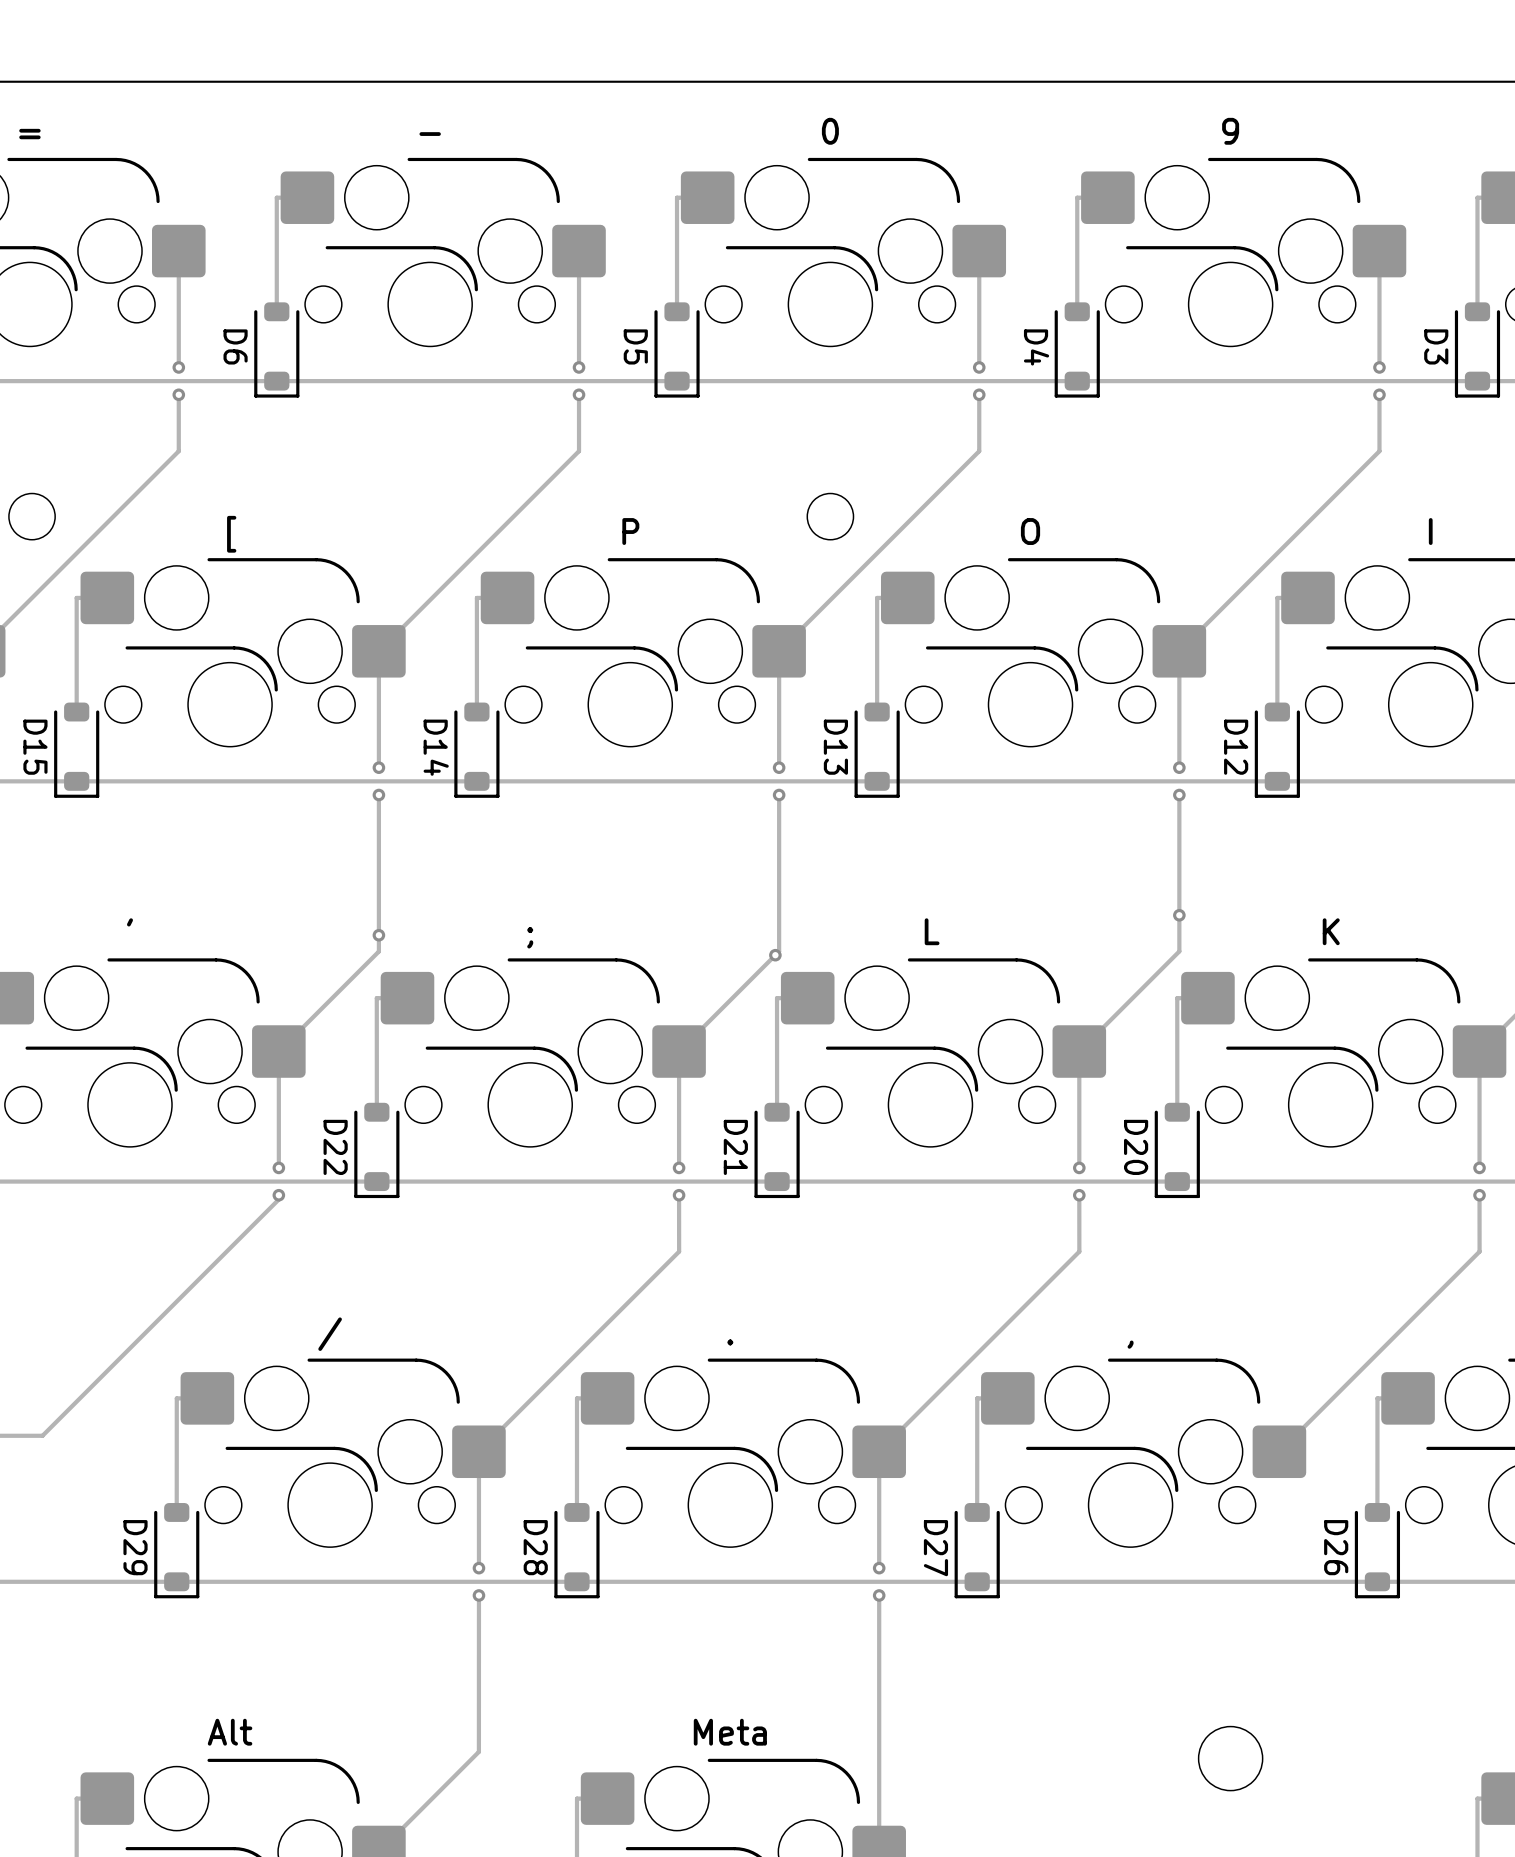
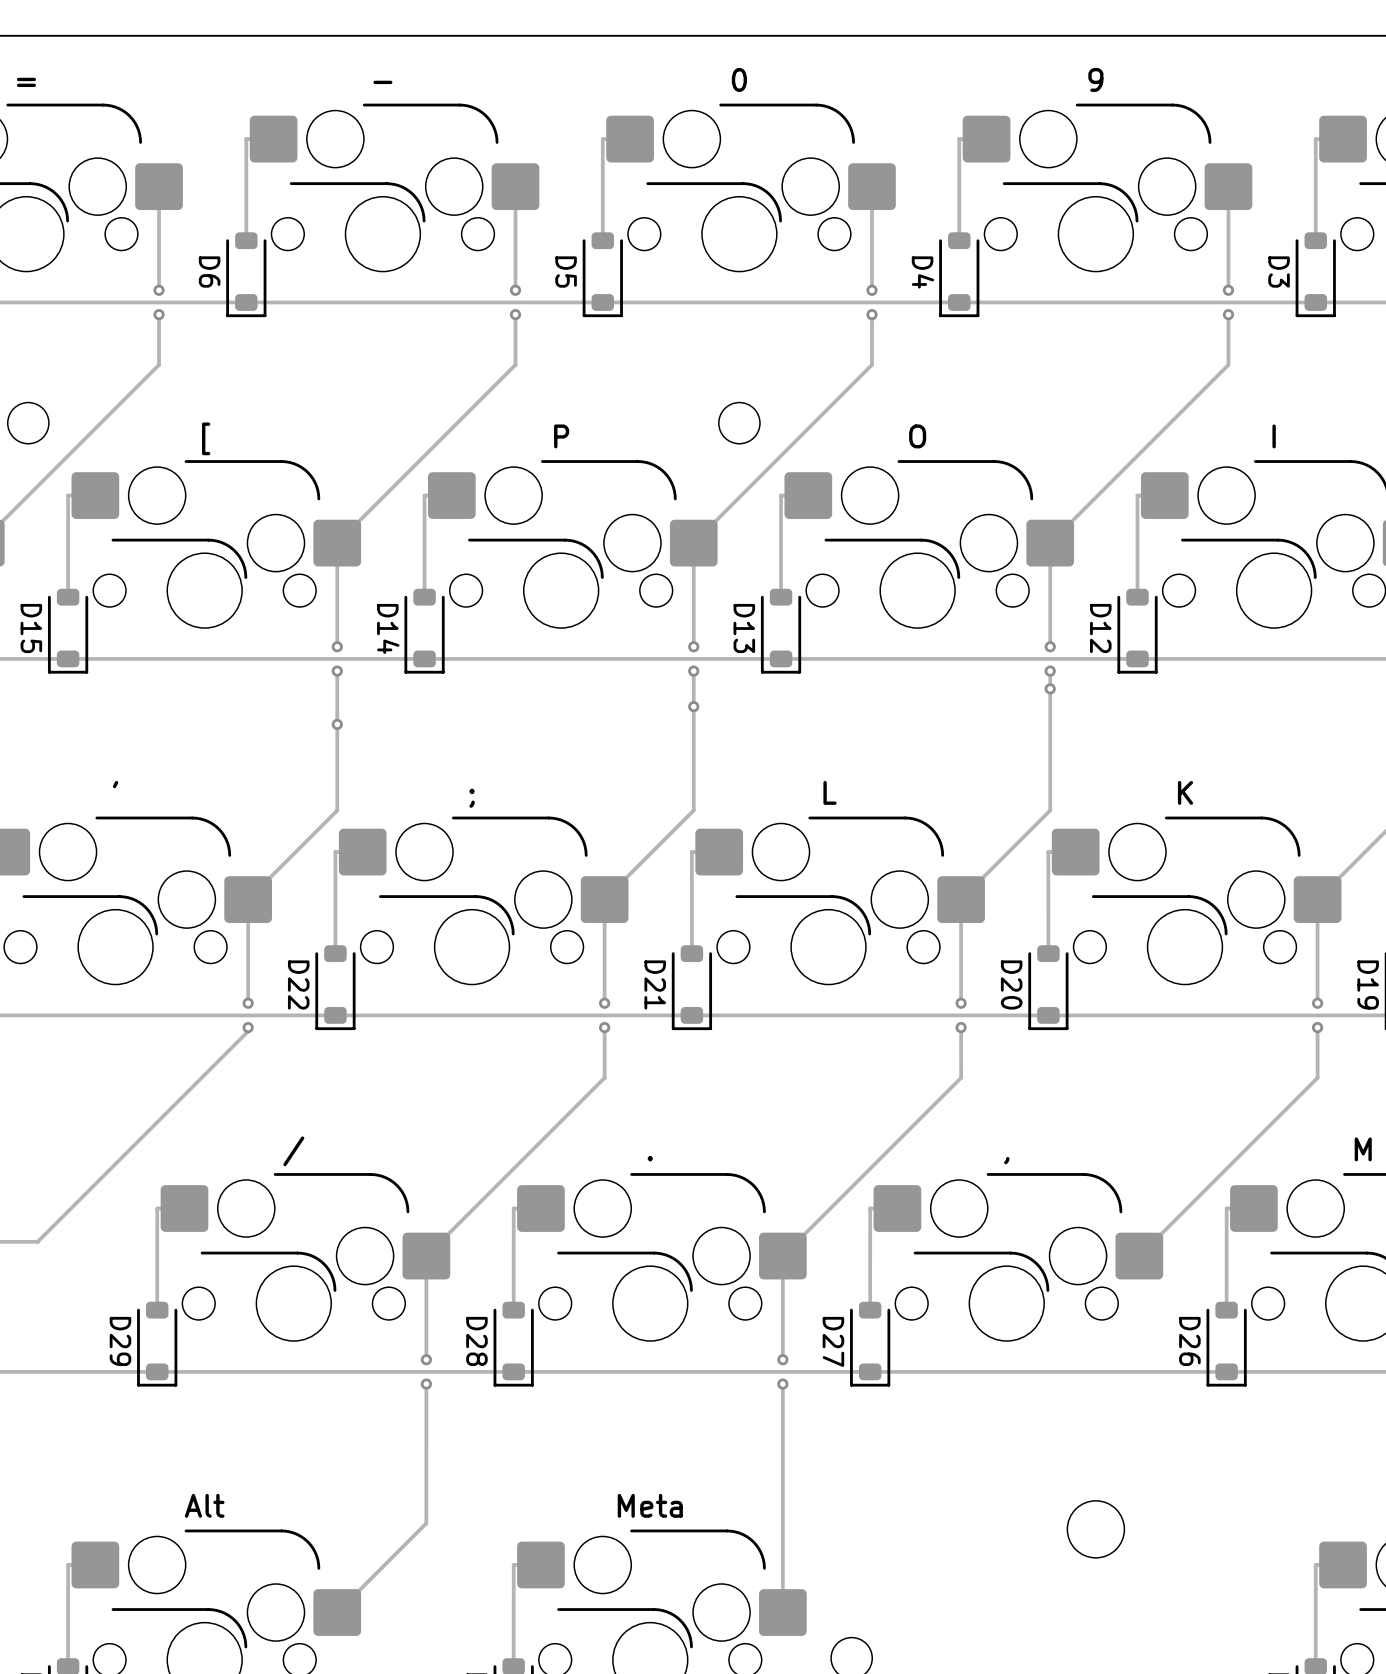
via position: (1179, 915) -> (1050, 688)
via position: (378, 935) -> (337, 724)
via position: (775, 955) -> (693, 706)

